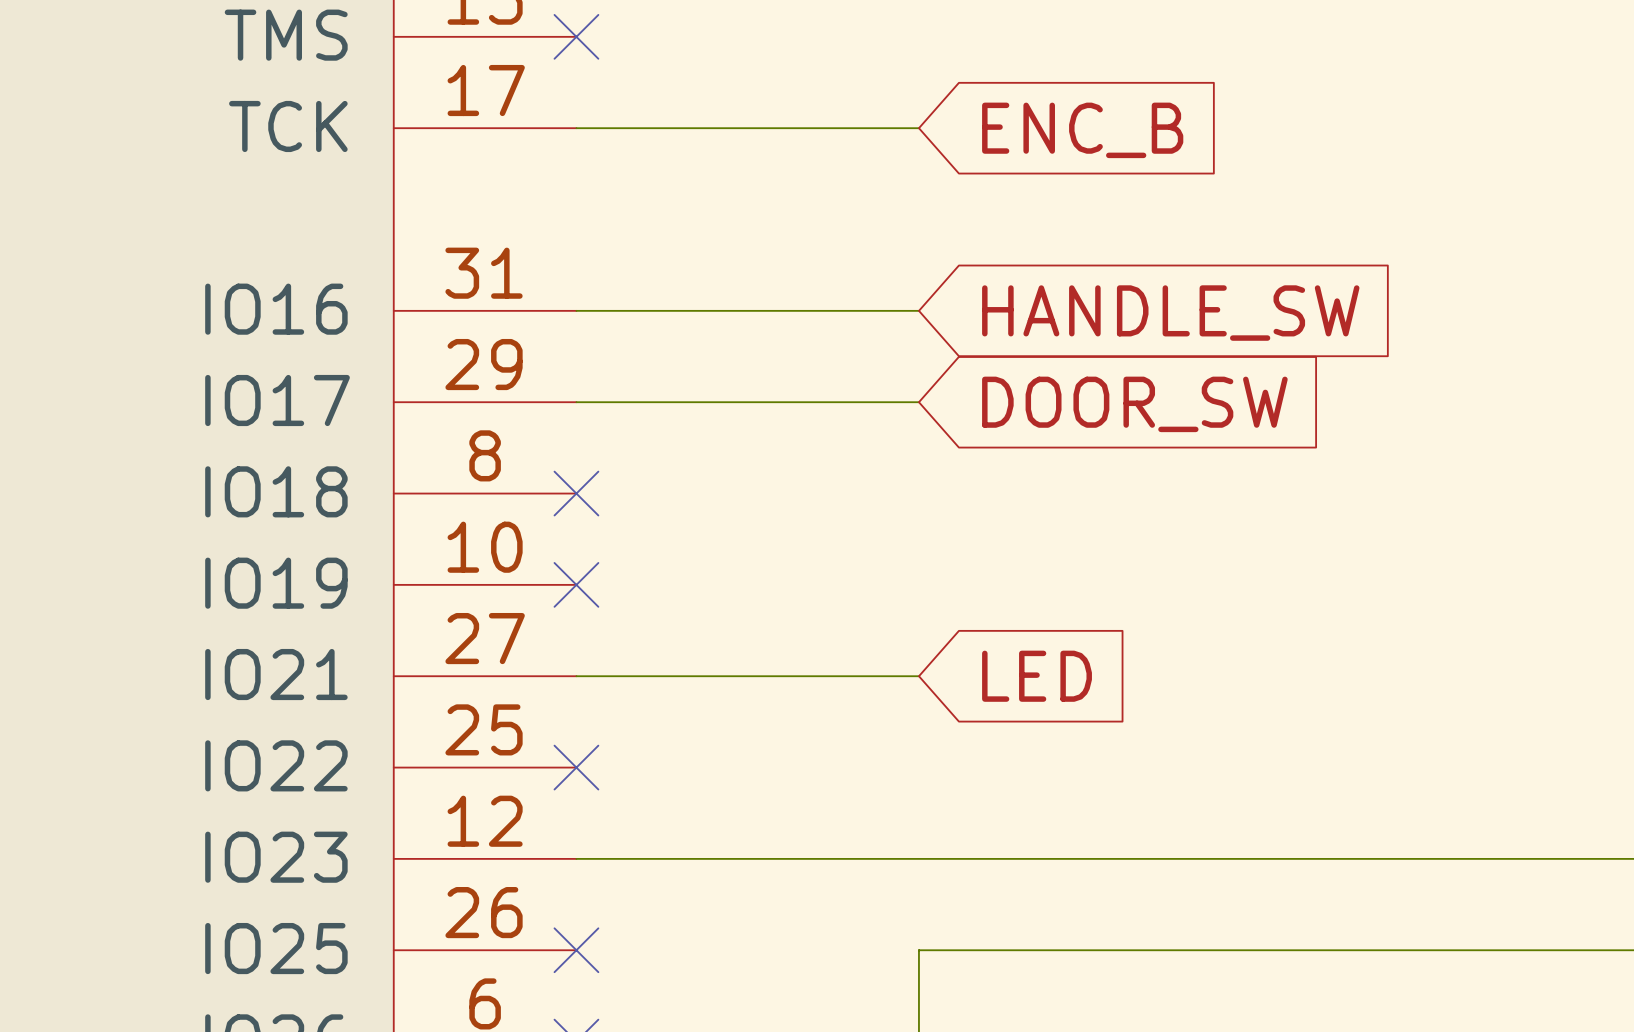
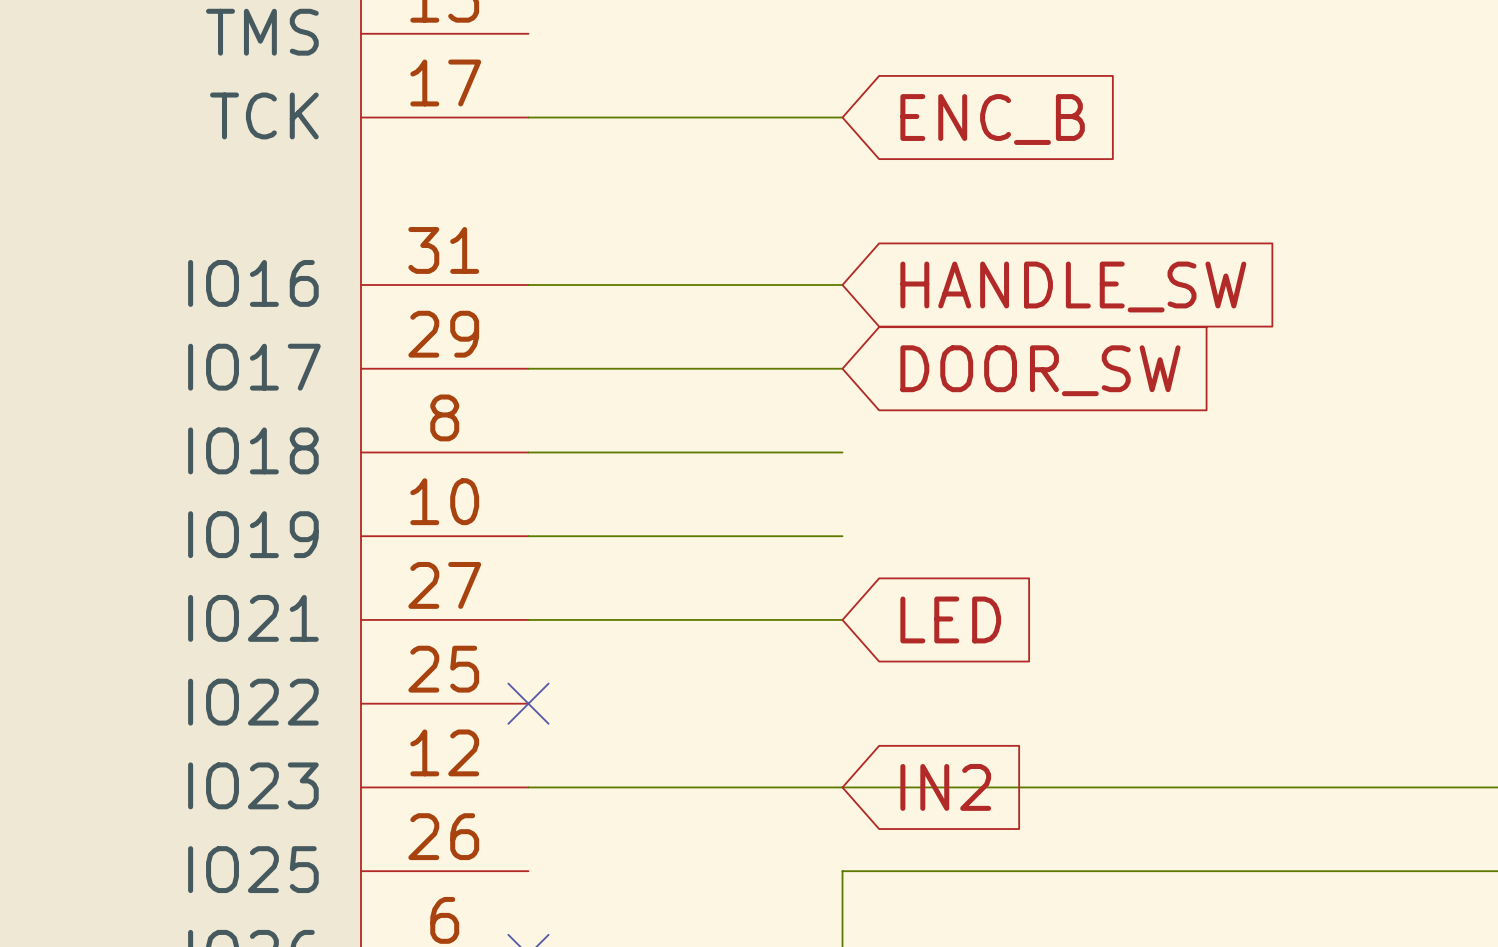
no-connect mark: (576, 36) -> none
wire: none -> (528, 452) (842, 452)
no-connect mark: (576, 493) -> none
wire: none -> (528, 536) (842, 536)
no-connect mark: (576, 584) -> none
global label: none -> IN2 (945, 787)
no-connect mark: (576, 950) -> none

